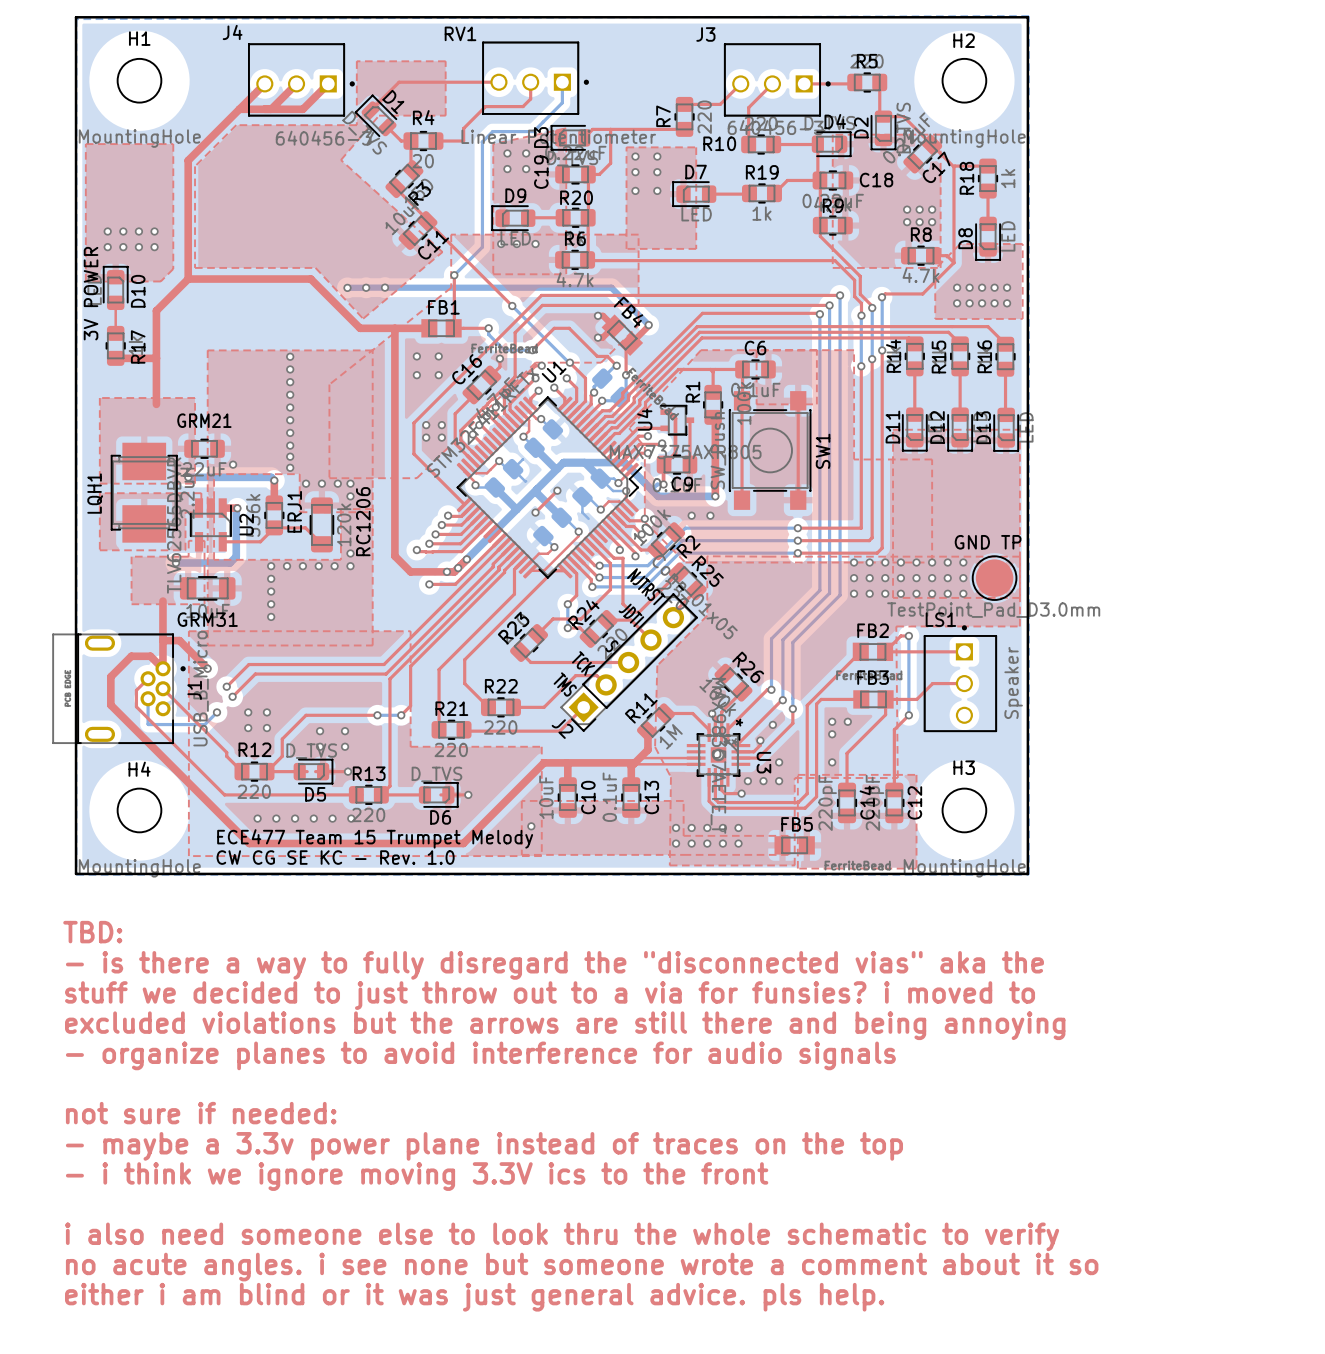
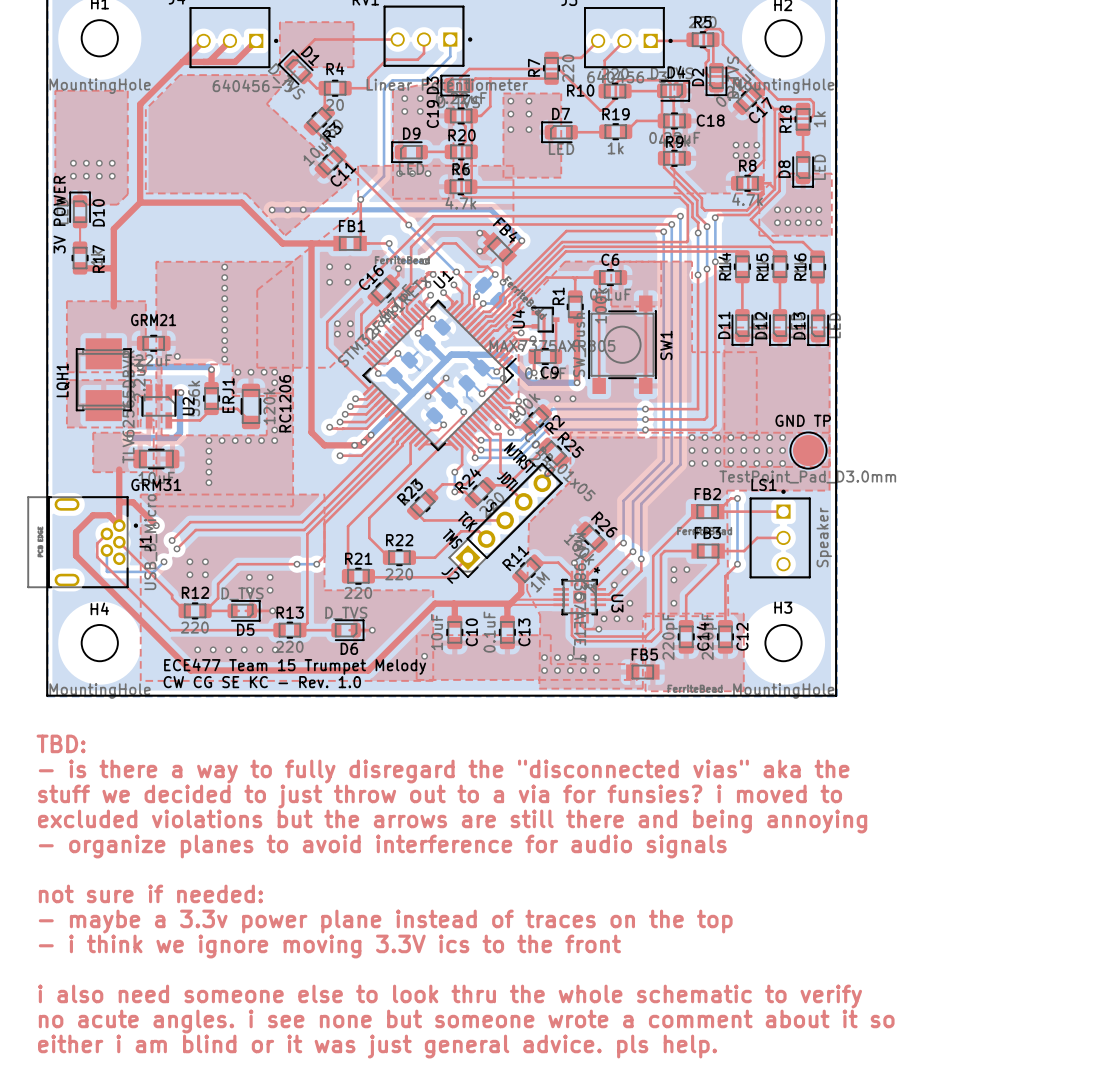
top track: (847, 326) (952, 326) -> (686, 242) (687, 205) (679, 197) (465, 197) (461, 193) (461, 159) (462, 144) (465, 141) (465, 126) (462, 123) (462, 95) (460, 92) (460, 78) (469, 69) (558, 69) (600, 110) (603, 110) (615, 98) (615, 83) (619, 80) (667, 80) (670, 83) (670, 98) (673, 101) (673, 165) (671, 167) (701, 198) (701, 207) (704, 210) (747, 210) (763, 193) (751, 193) (748, 190) (748, 176) (764, 160) (764, 112) (728, 76) (709, 76) (705, 73) (708, 50) (703, 46) (703, 32) (707, 29) (719, 29) (722, 32) (722, 44) (777, 99) (810, 99) (813, 102) (813, 115) (810, 118) (784, 118) (779, 113) (779, 191) (750, 219) (773, 242)

